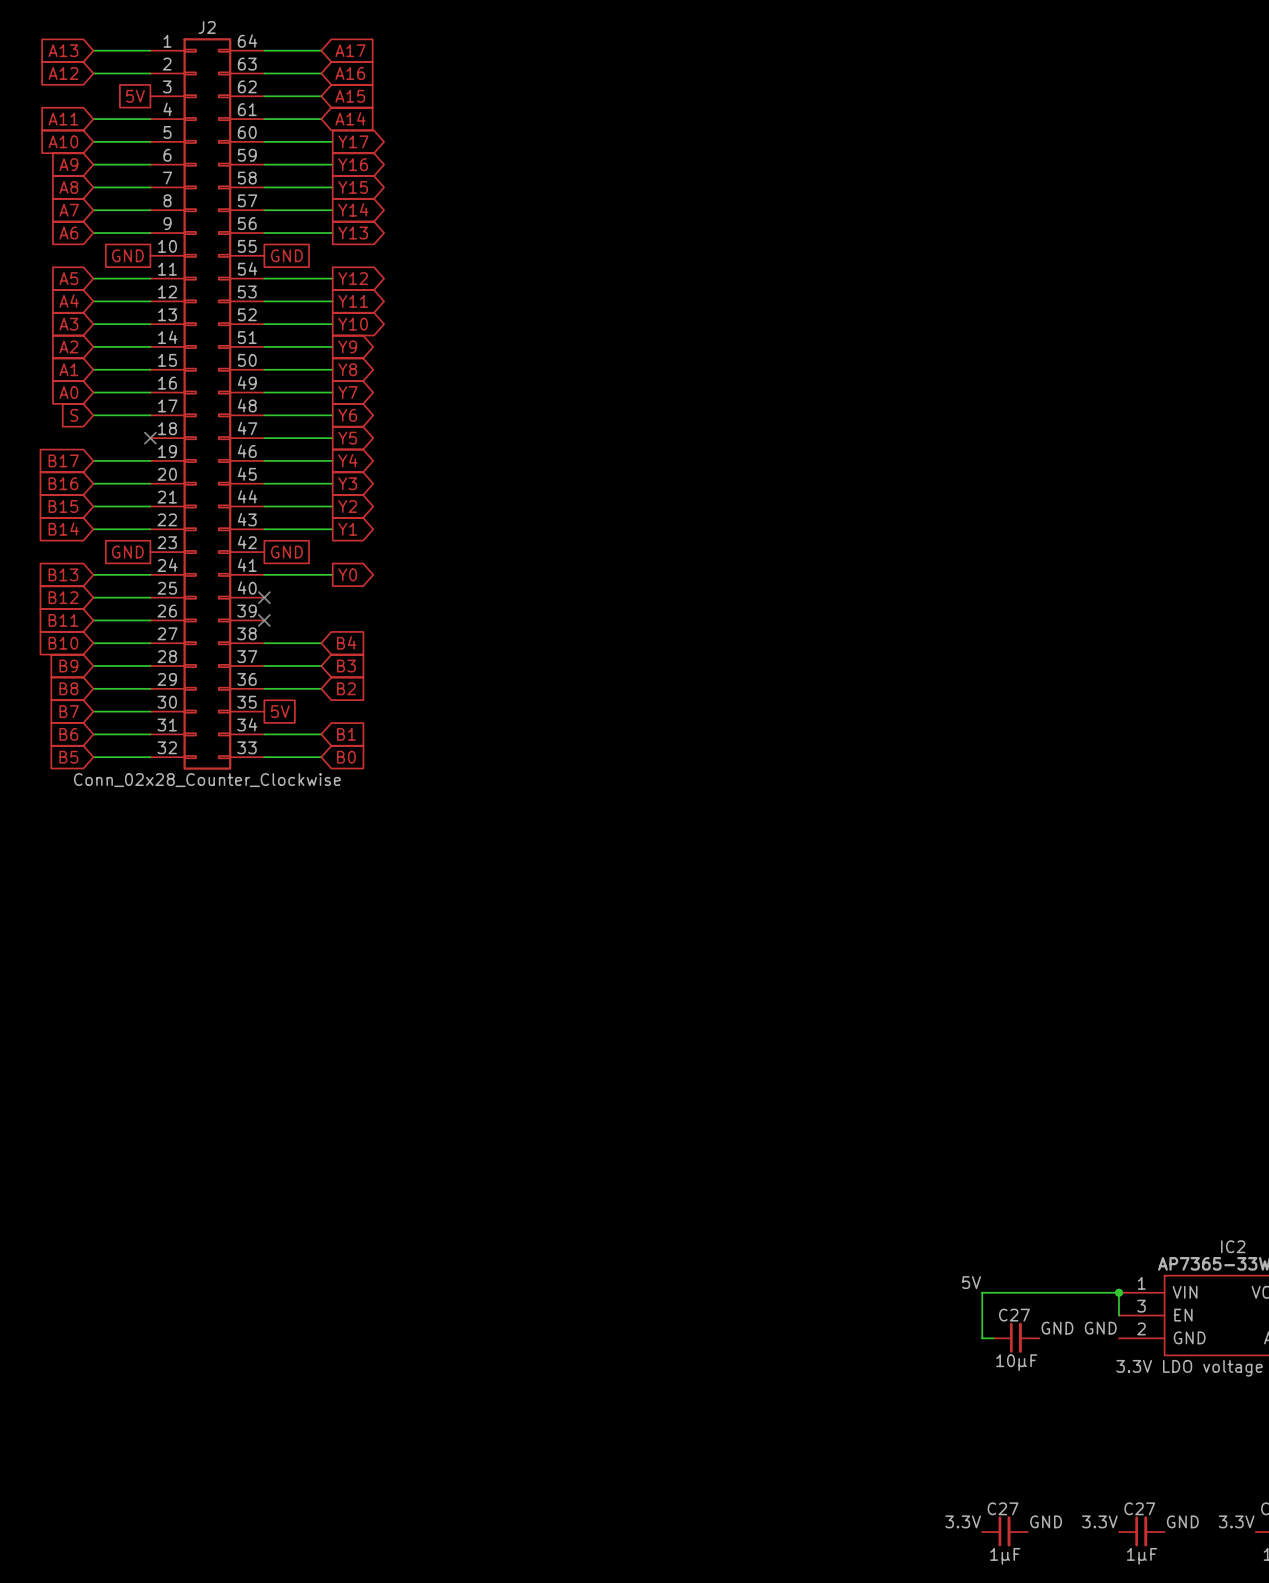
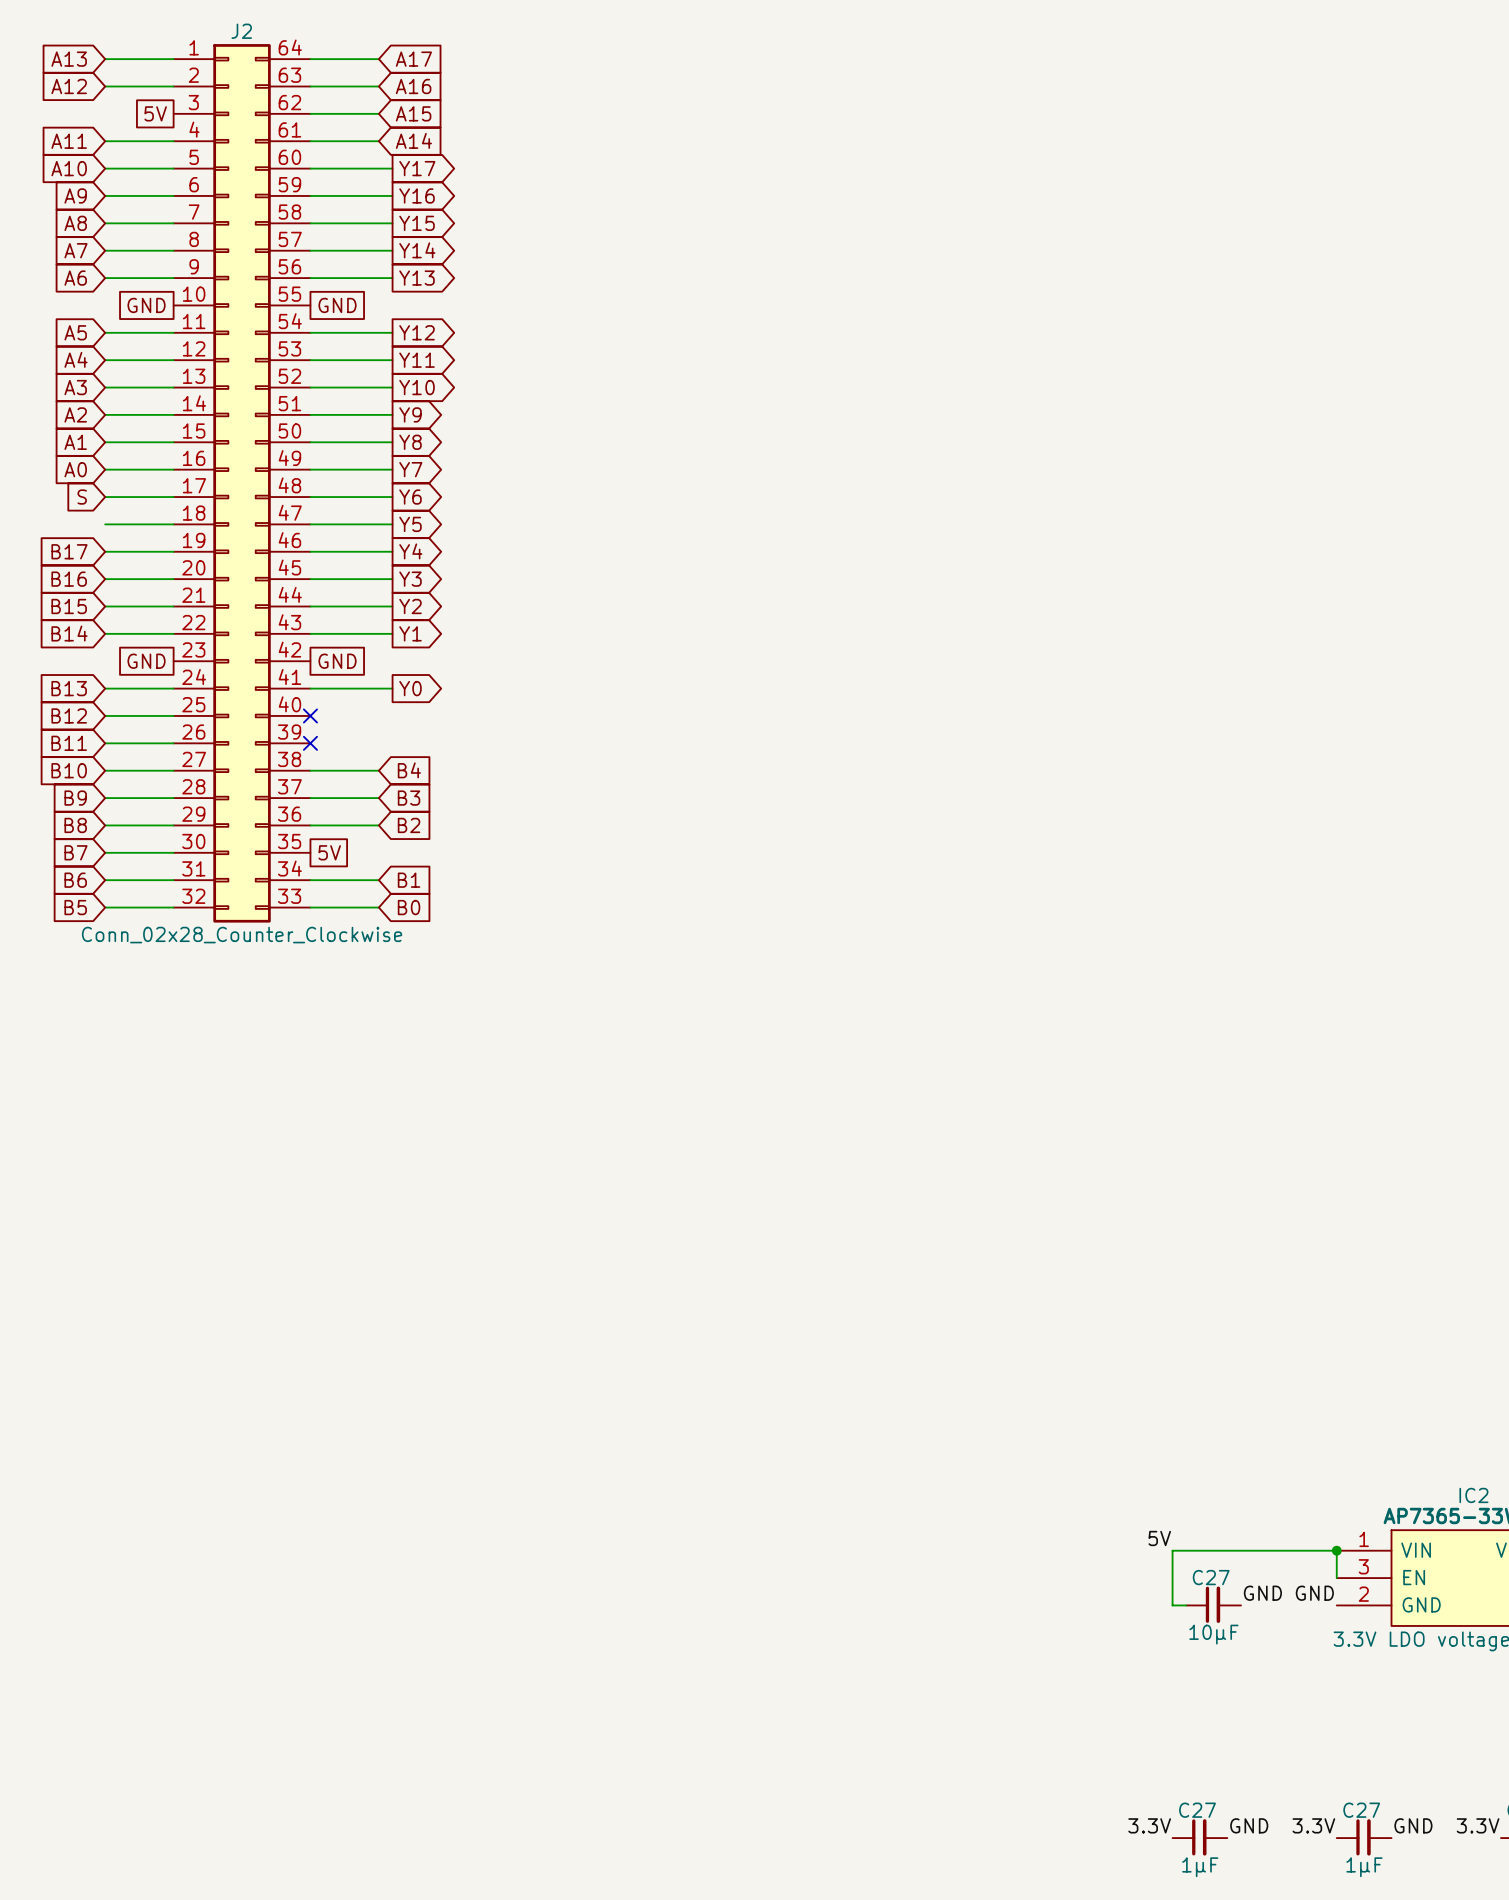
wire: none -> (105, 524) (173, 524)
no-connect mark: (150, 438) -> none

